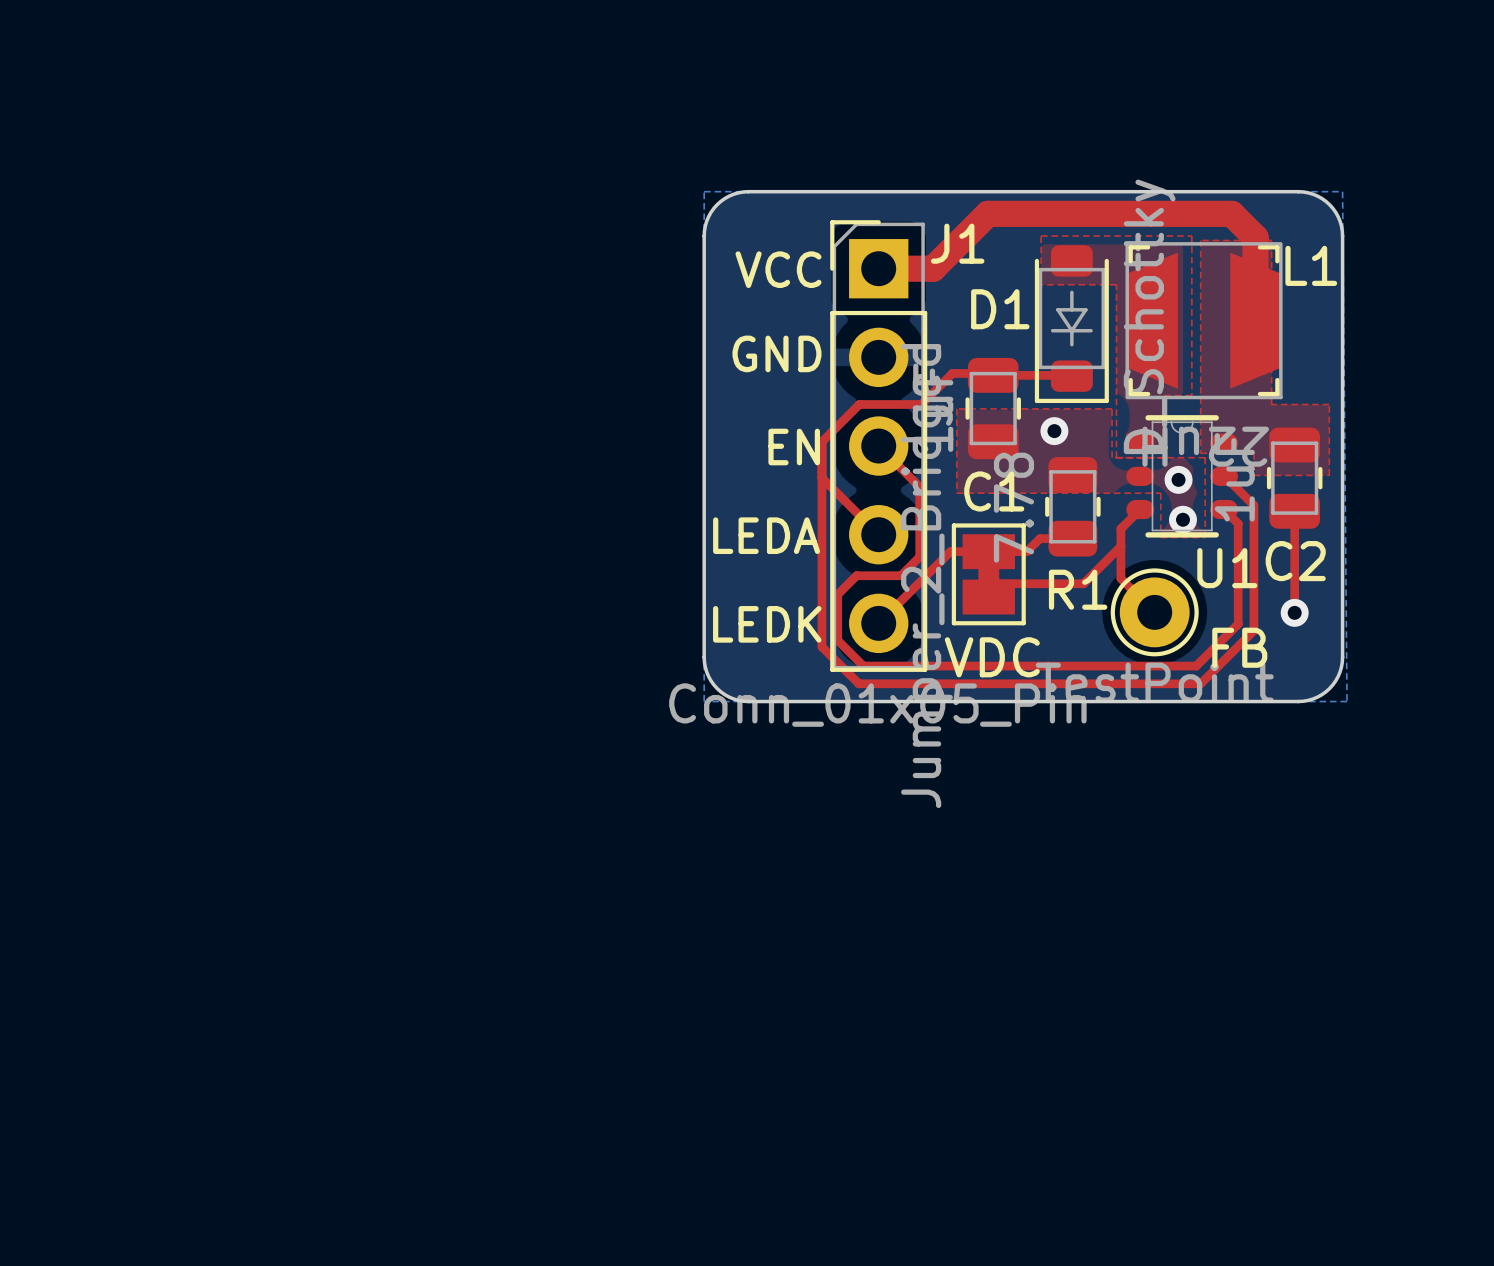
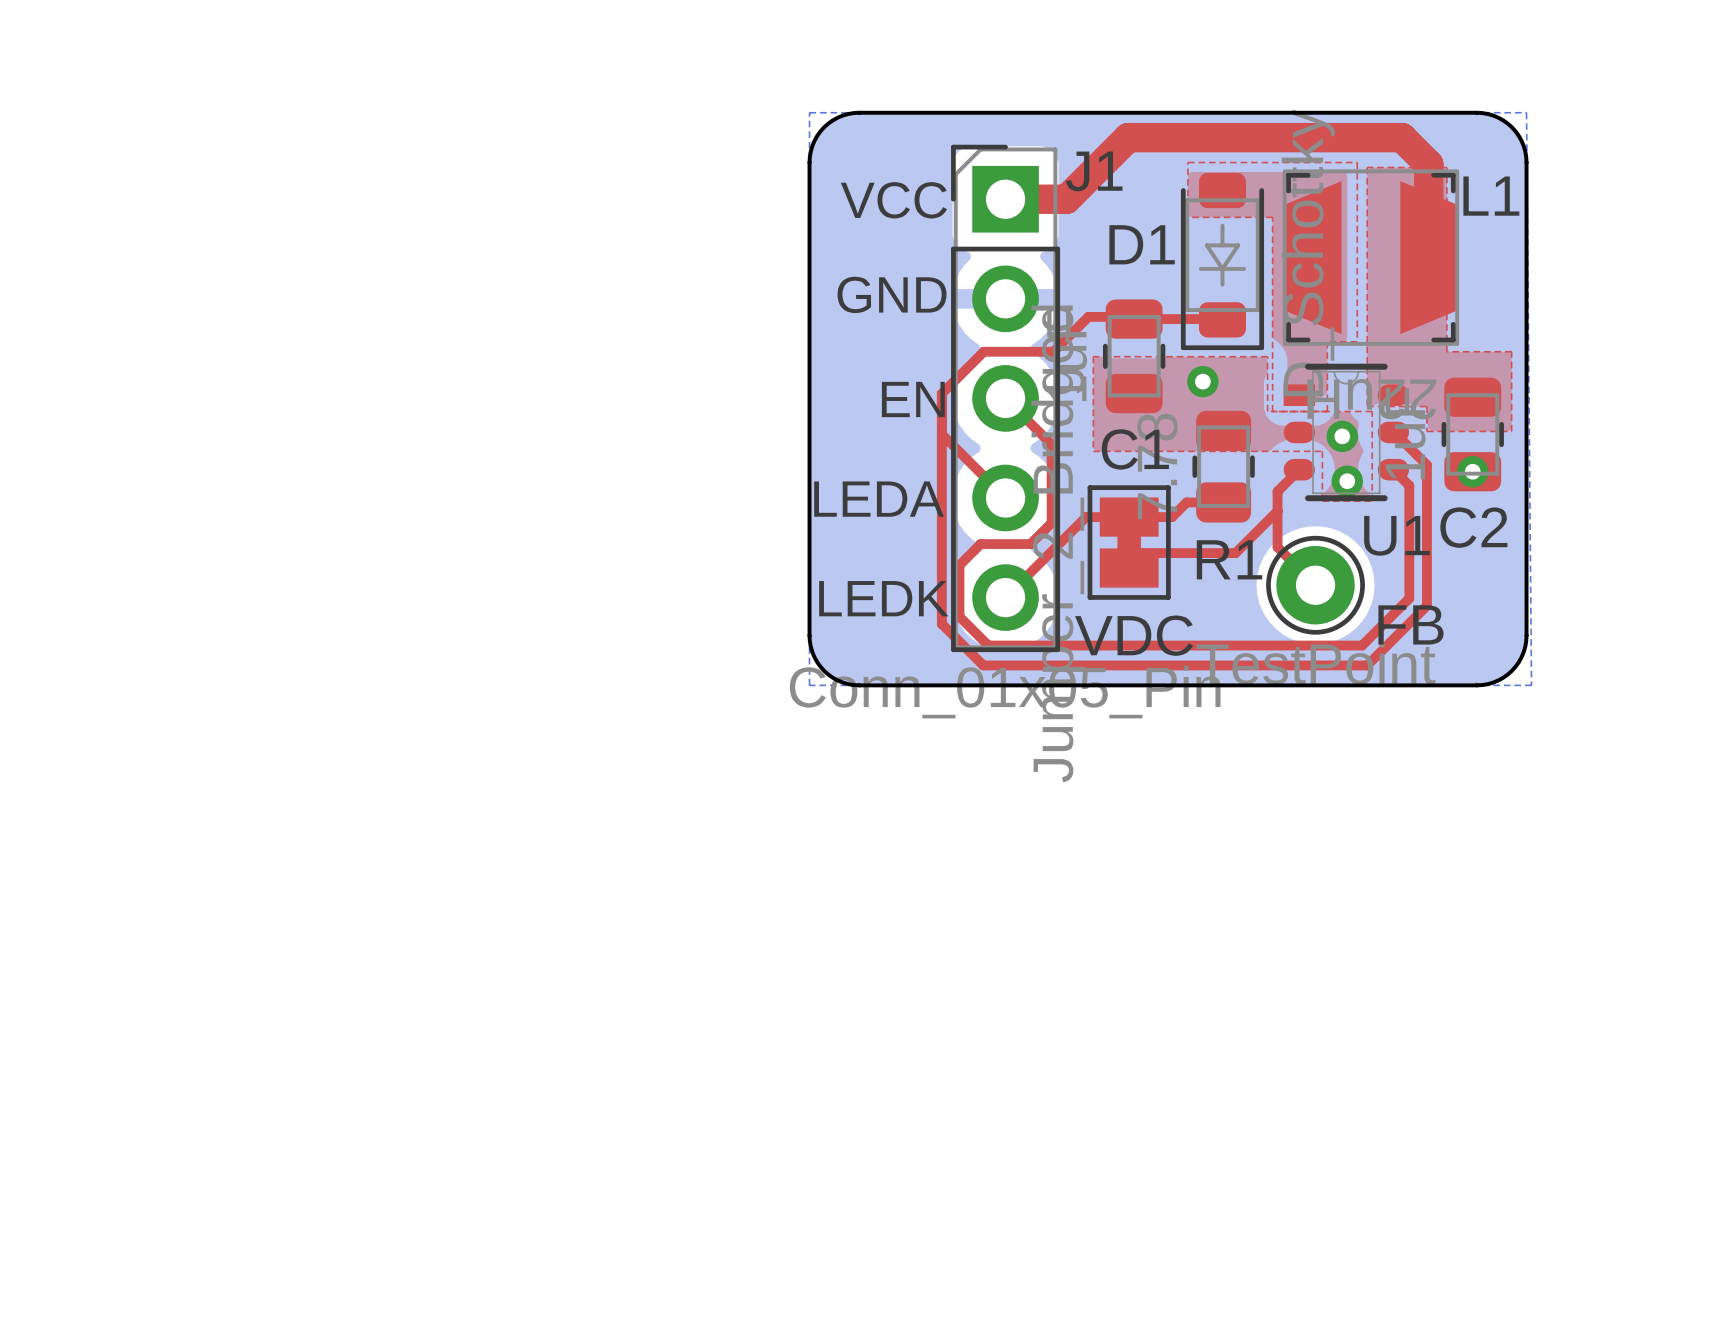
top track: (1294, 511) (1294, 612) -> none
via position: (1294, 612) -> (1472, 471)

